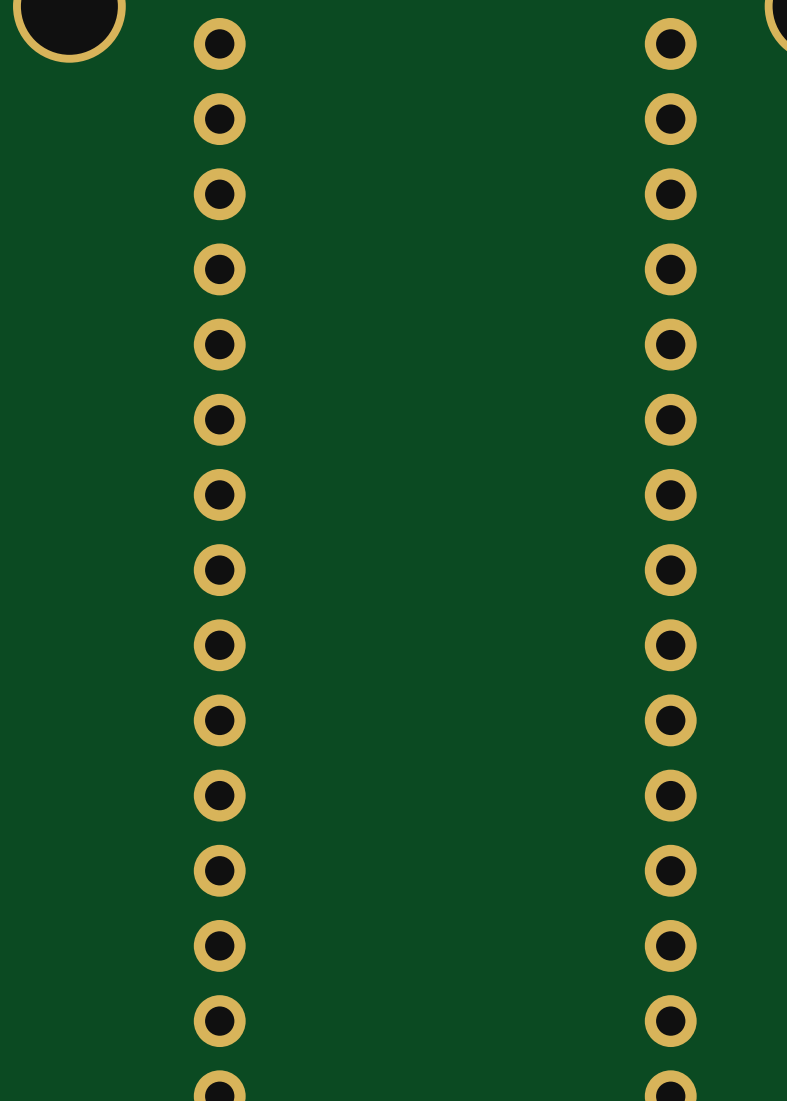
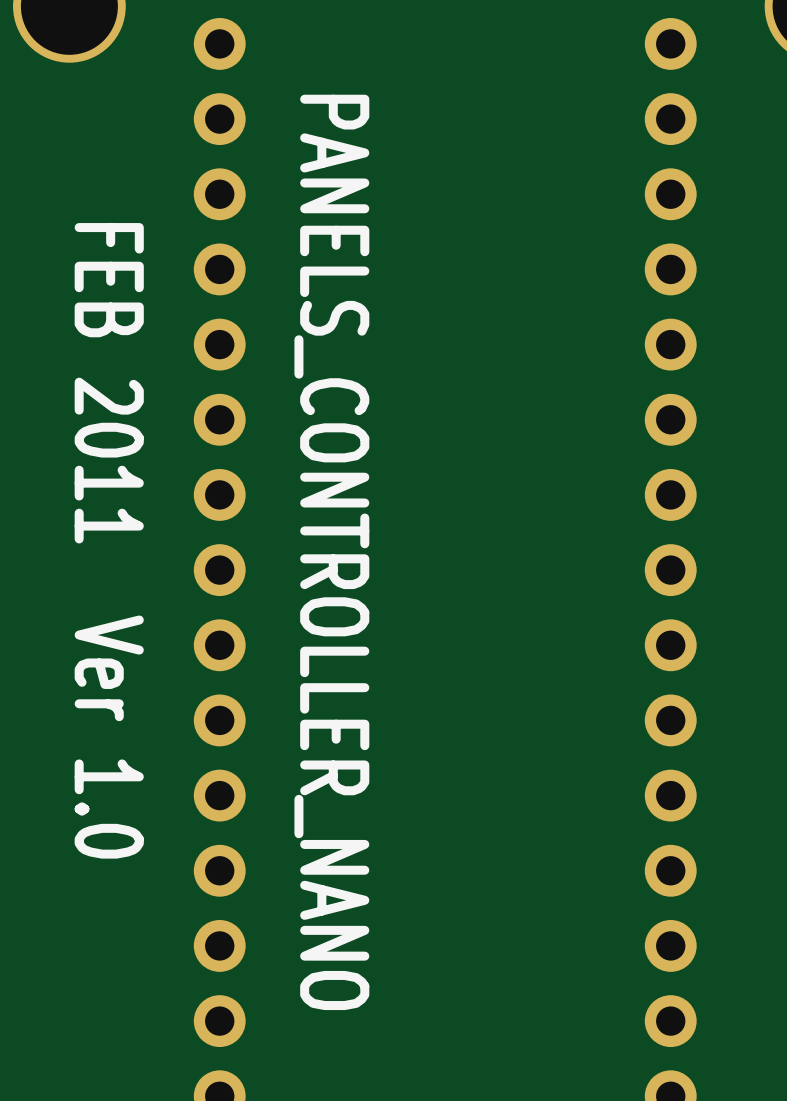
text: none -> FEB 2011 (109, 383)
text: none -> PANELS_CONTROLLER_NANO (331, 552)
text: none -> Ver 1.0 (109, 737)

